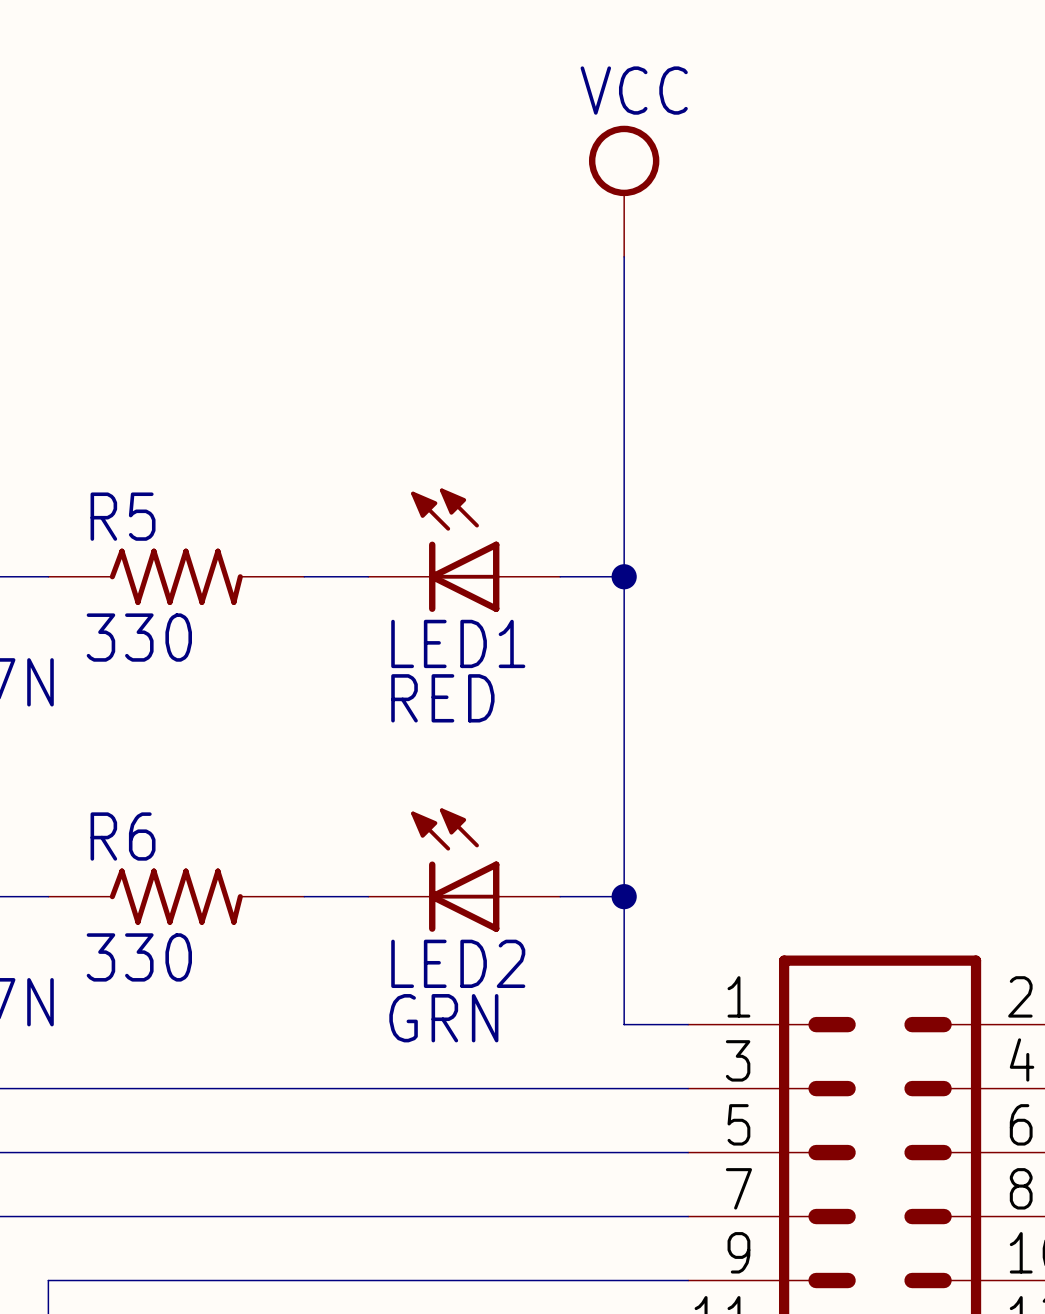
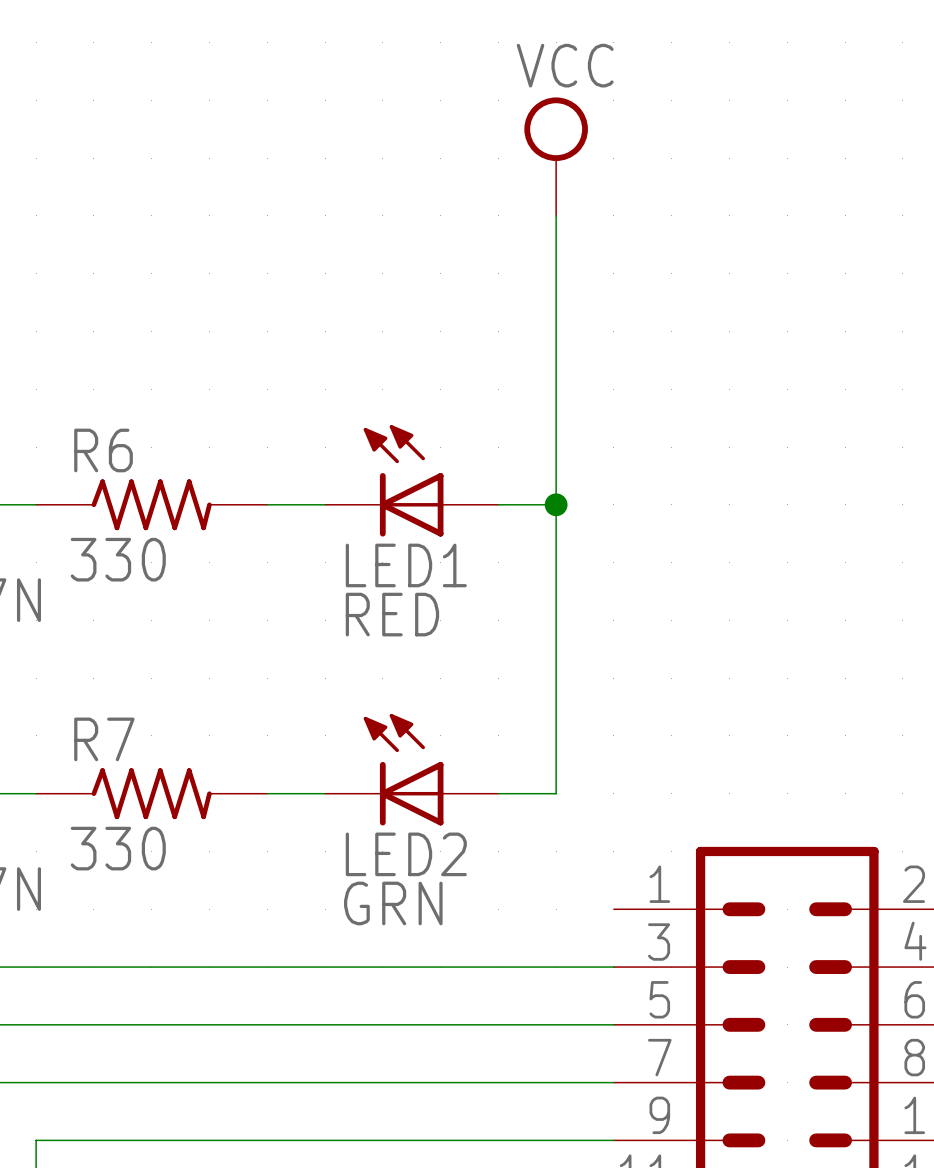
R5 name: R5 (123, 516) -> R6 (103, 450)
R6 name: R6 (123, 836) -> R7 (104, 739)
wire: (624, 896) (624, 1024) (688, 1024) -> none
junction: (624, 896) -> none

